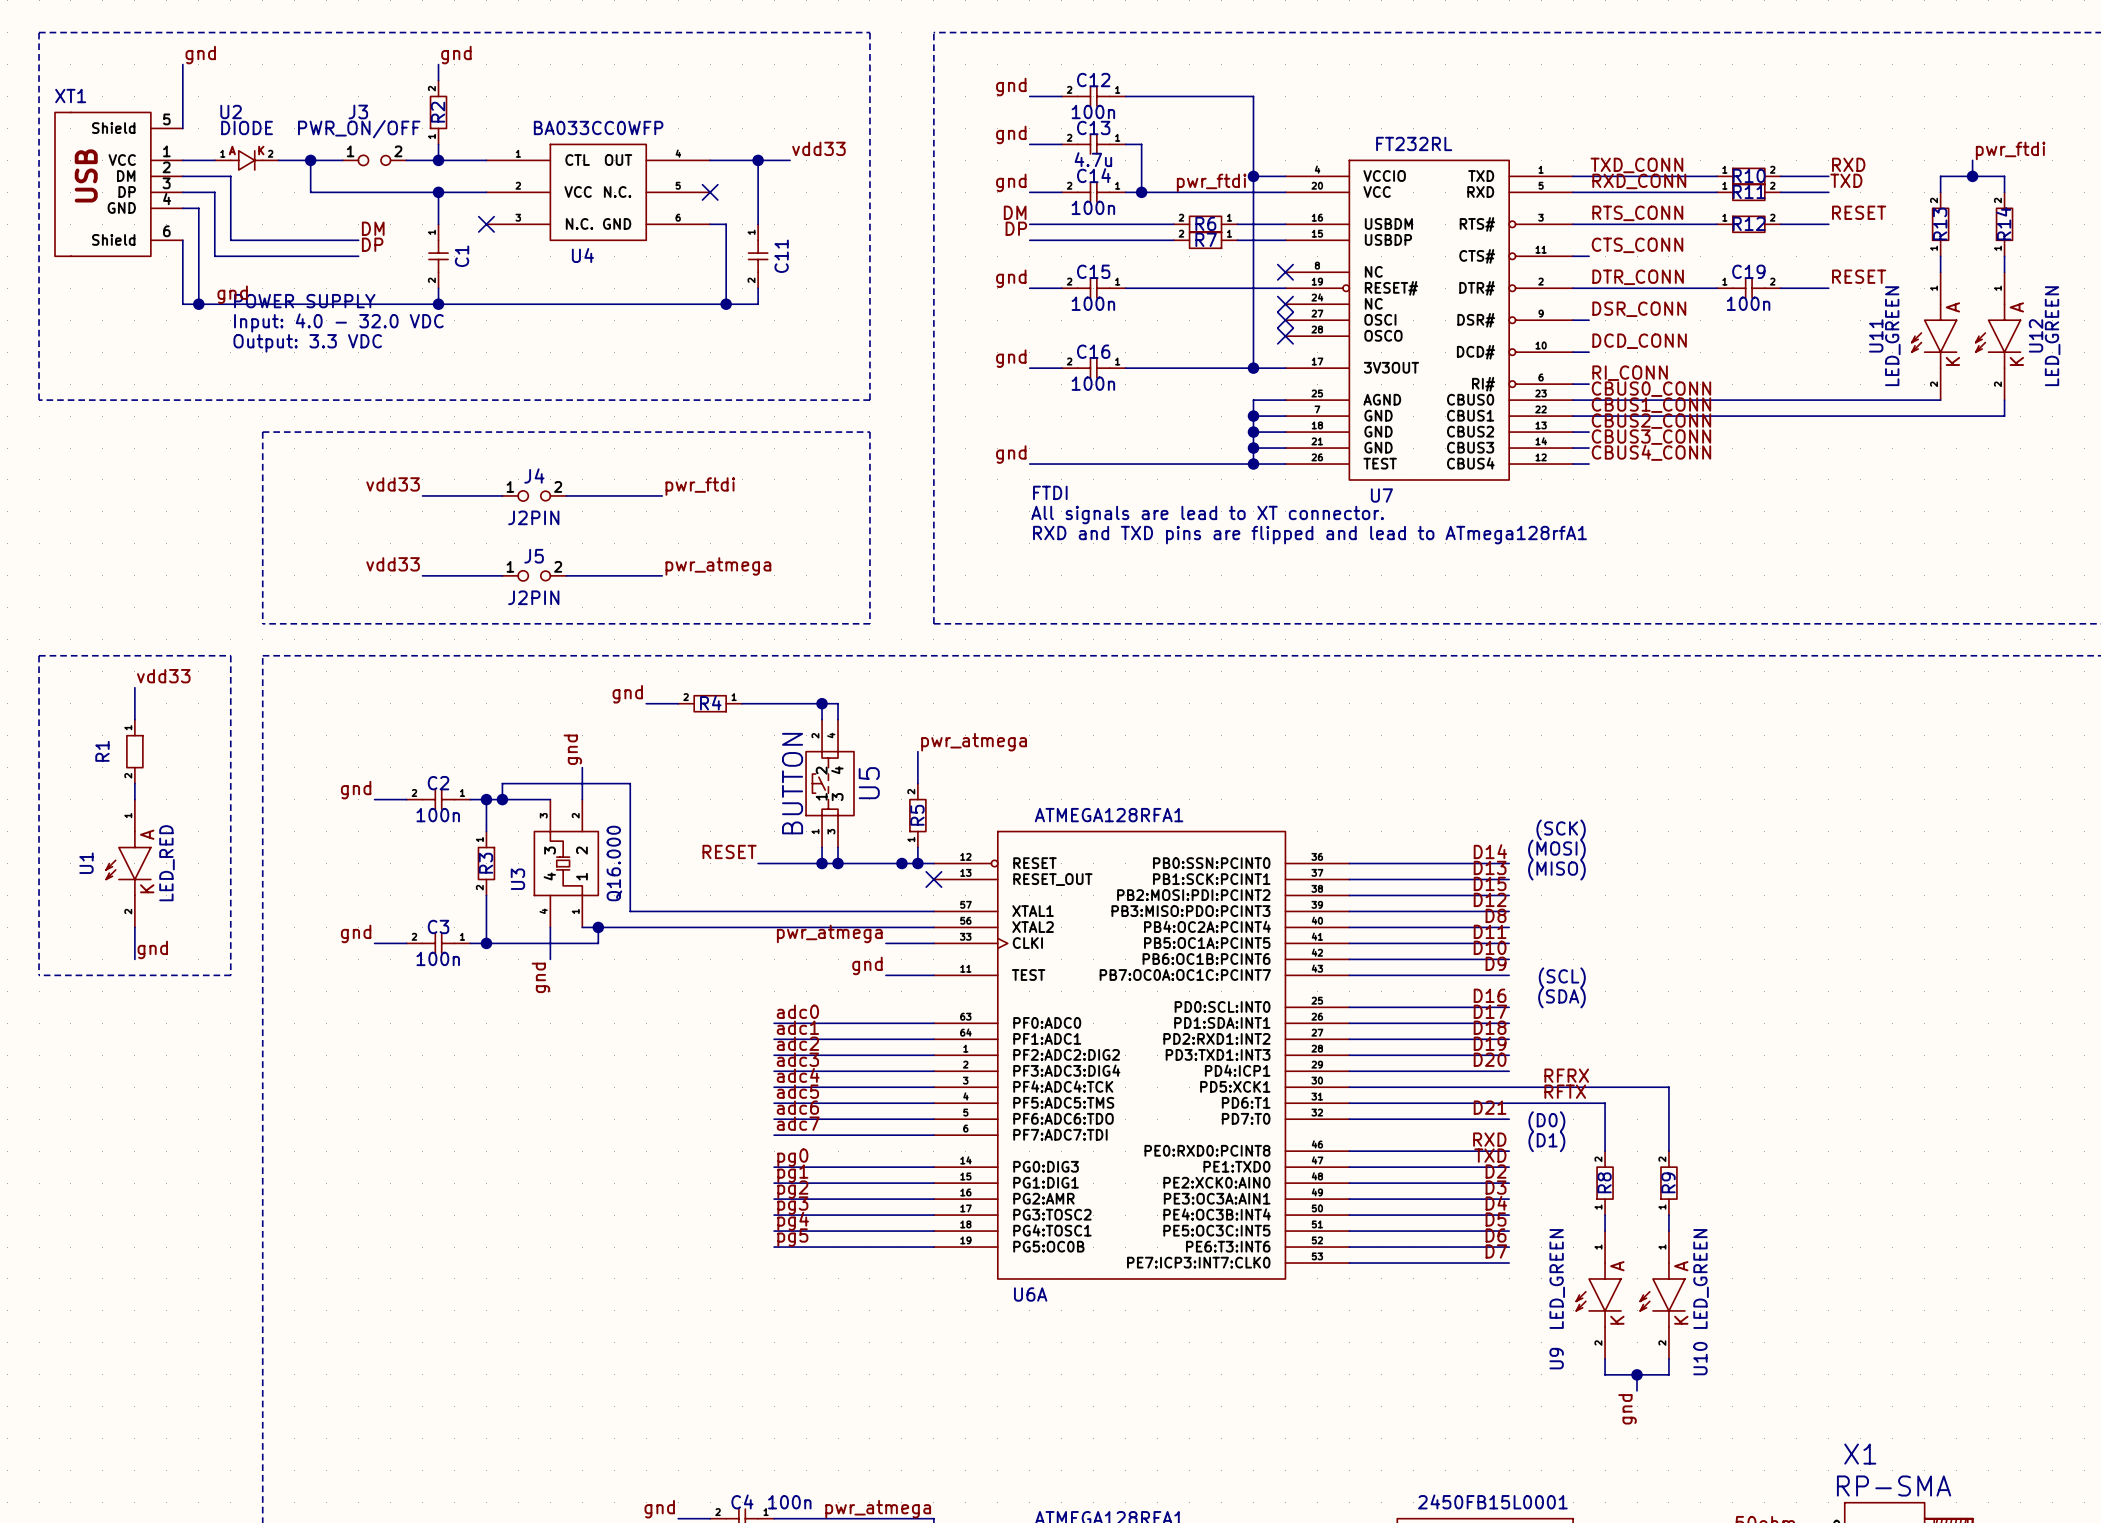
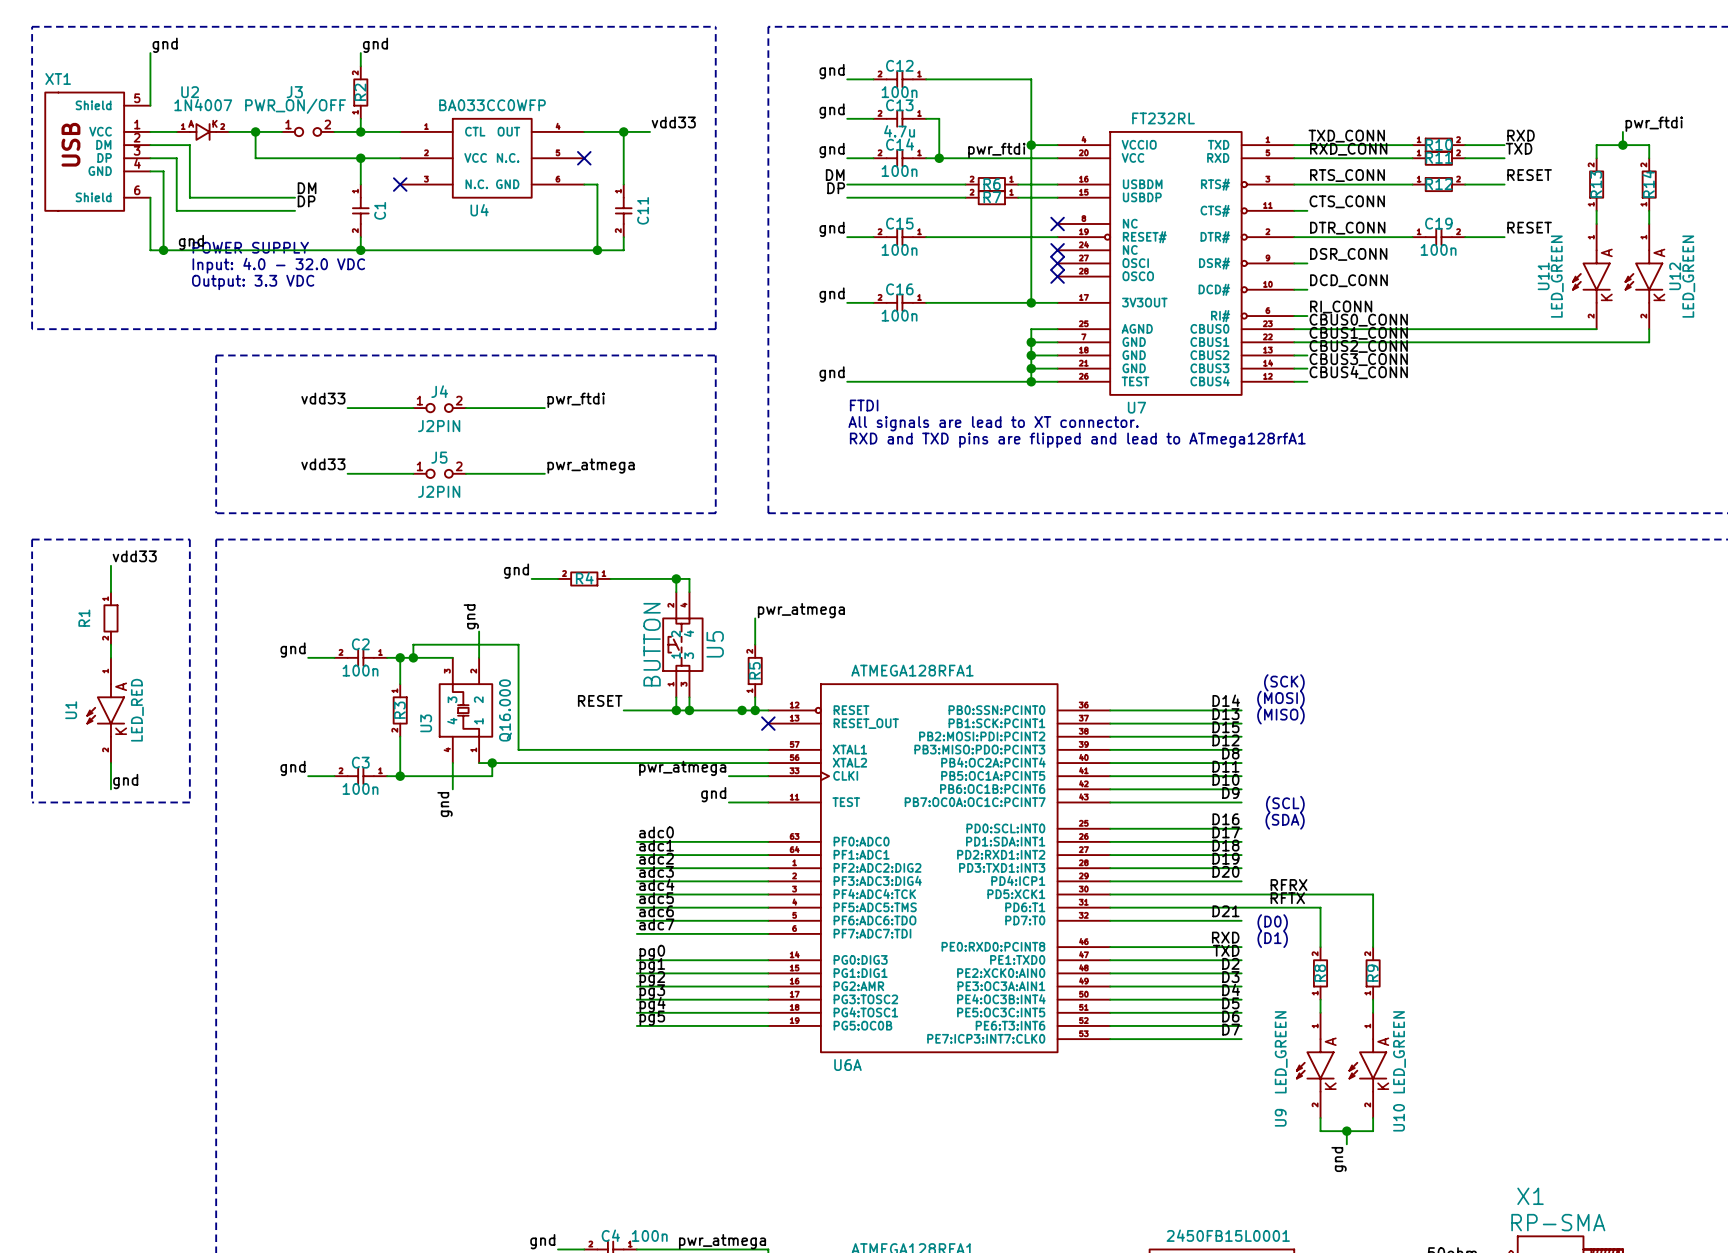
U2 value: DIODE (247, 127) -> 1N4007 (203, 105)

